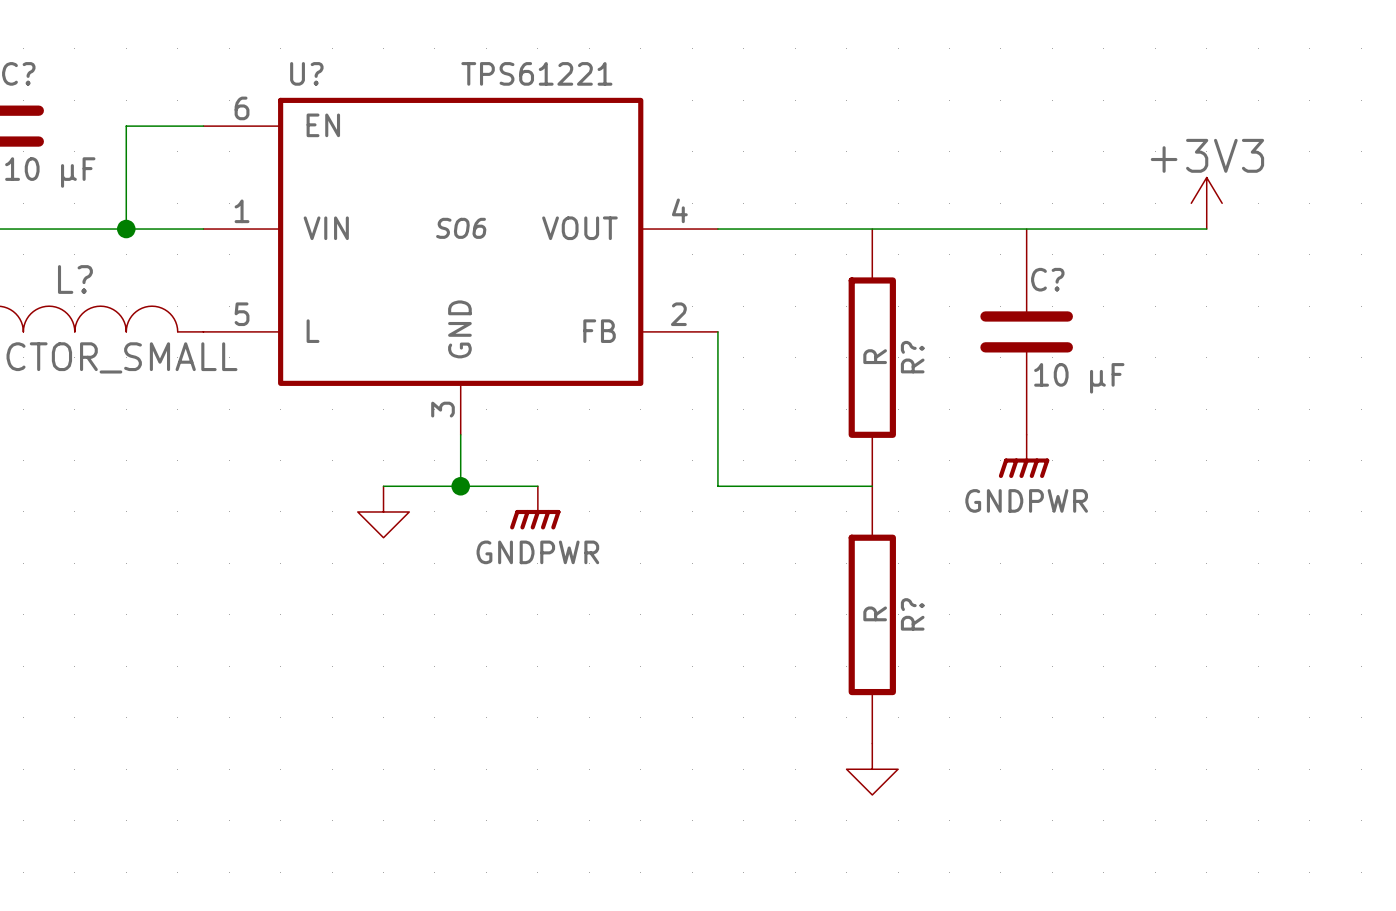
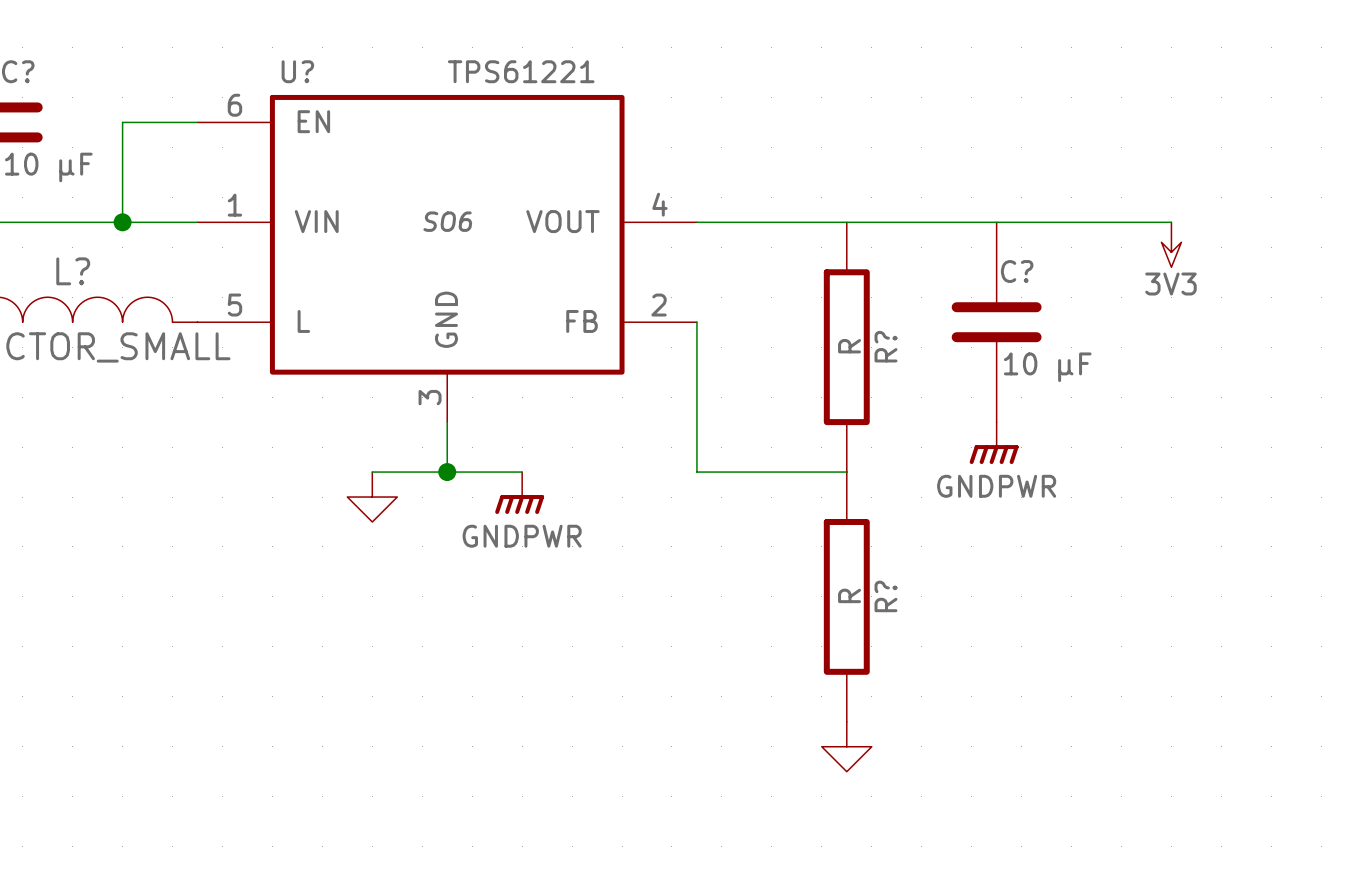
power symbol: +3V3 (1206, 203) -> none
power symbol: none -> 3V3 (1171, 244)

